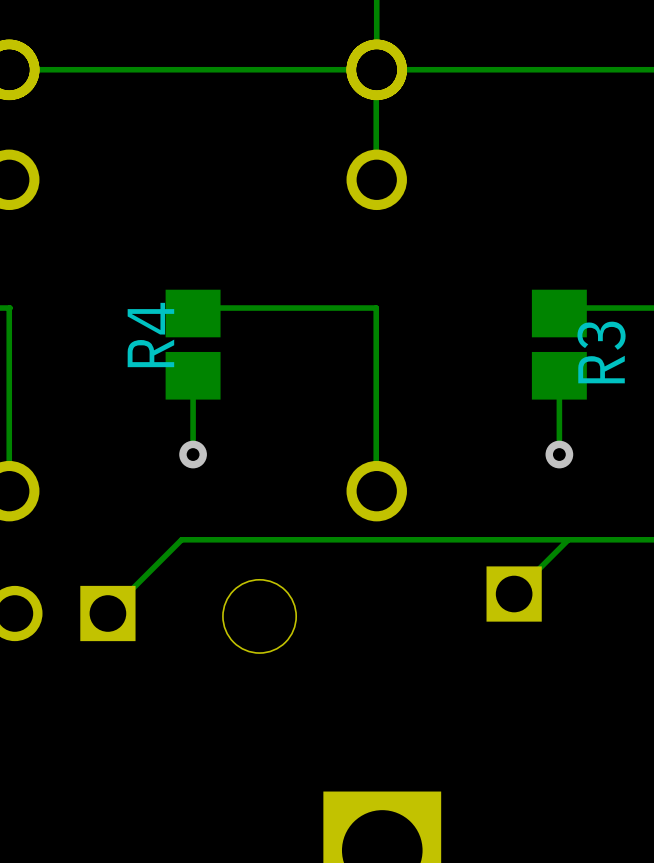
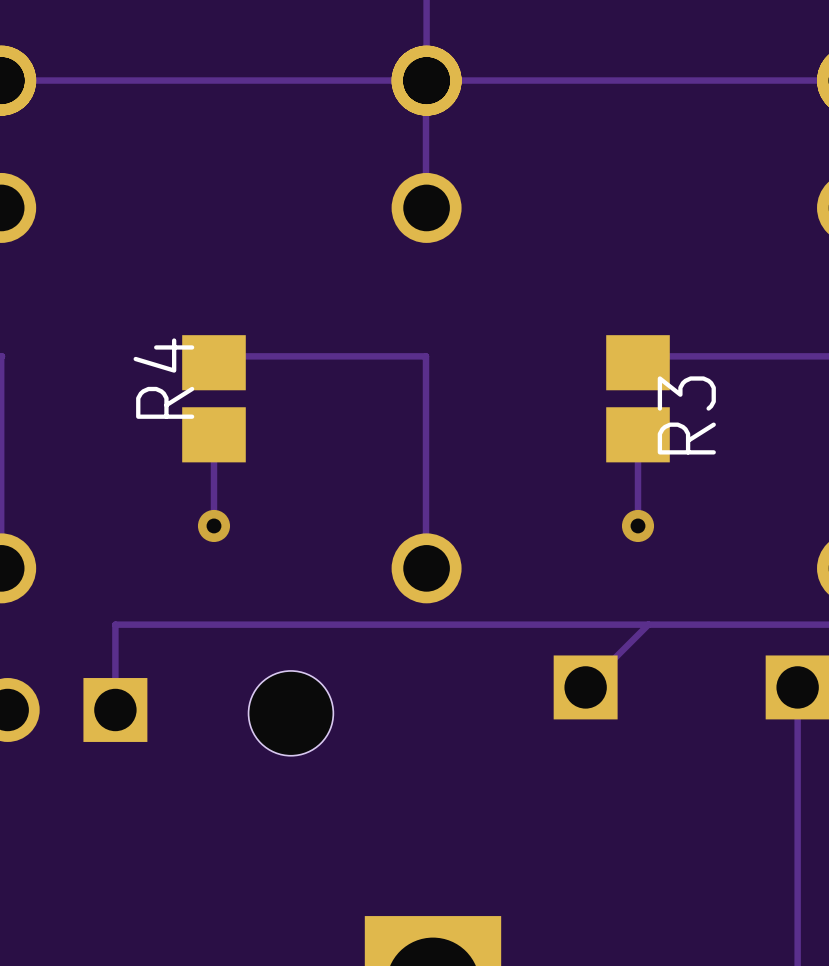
track: (181, 539) (107, 613) -> (200, 624) (115, 624) (115, 709)

